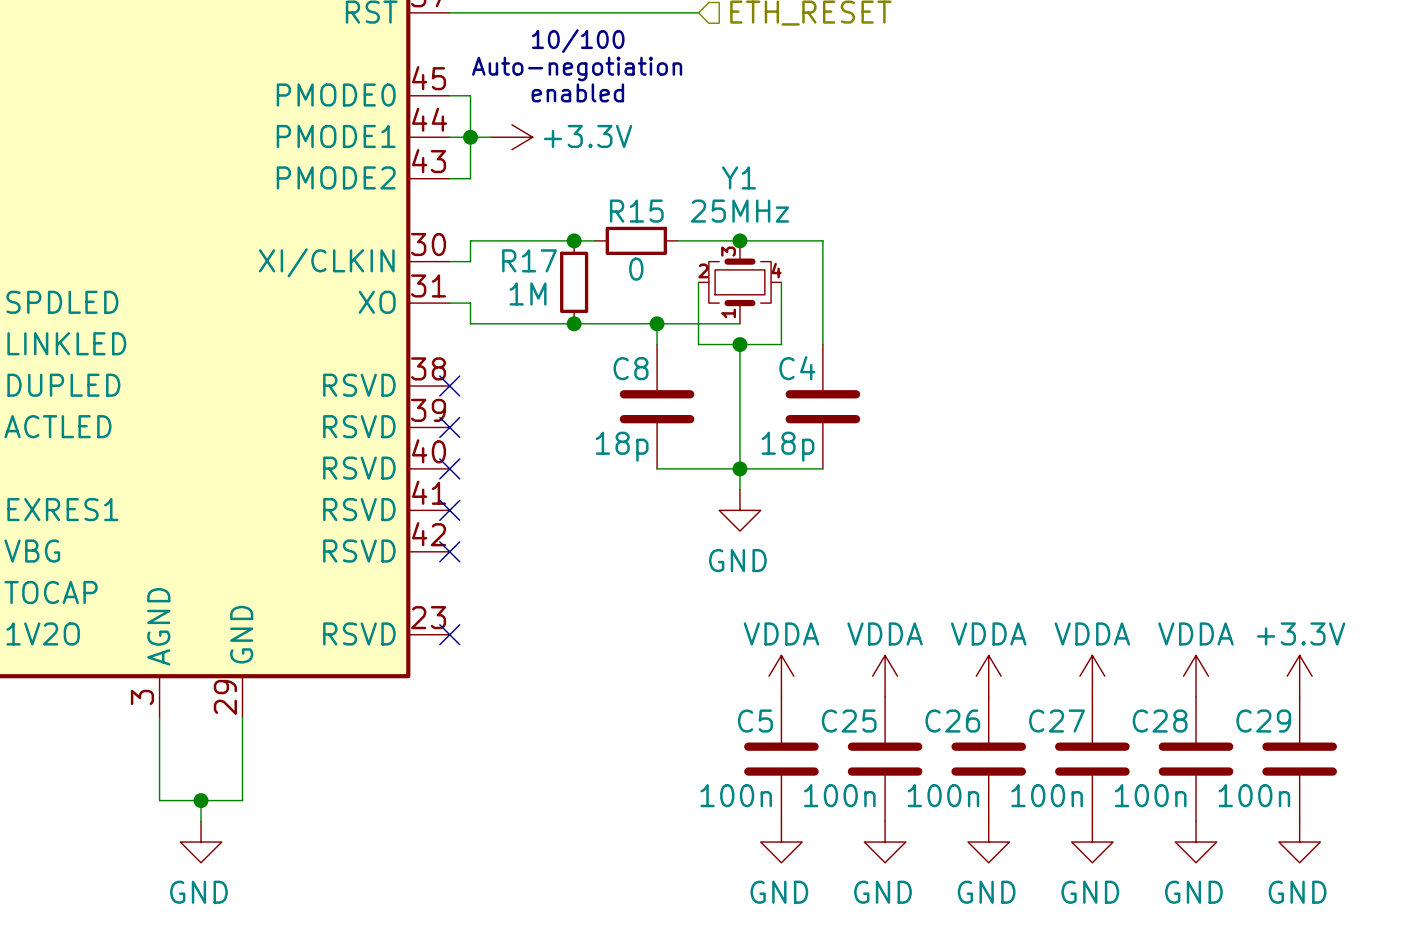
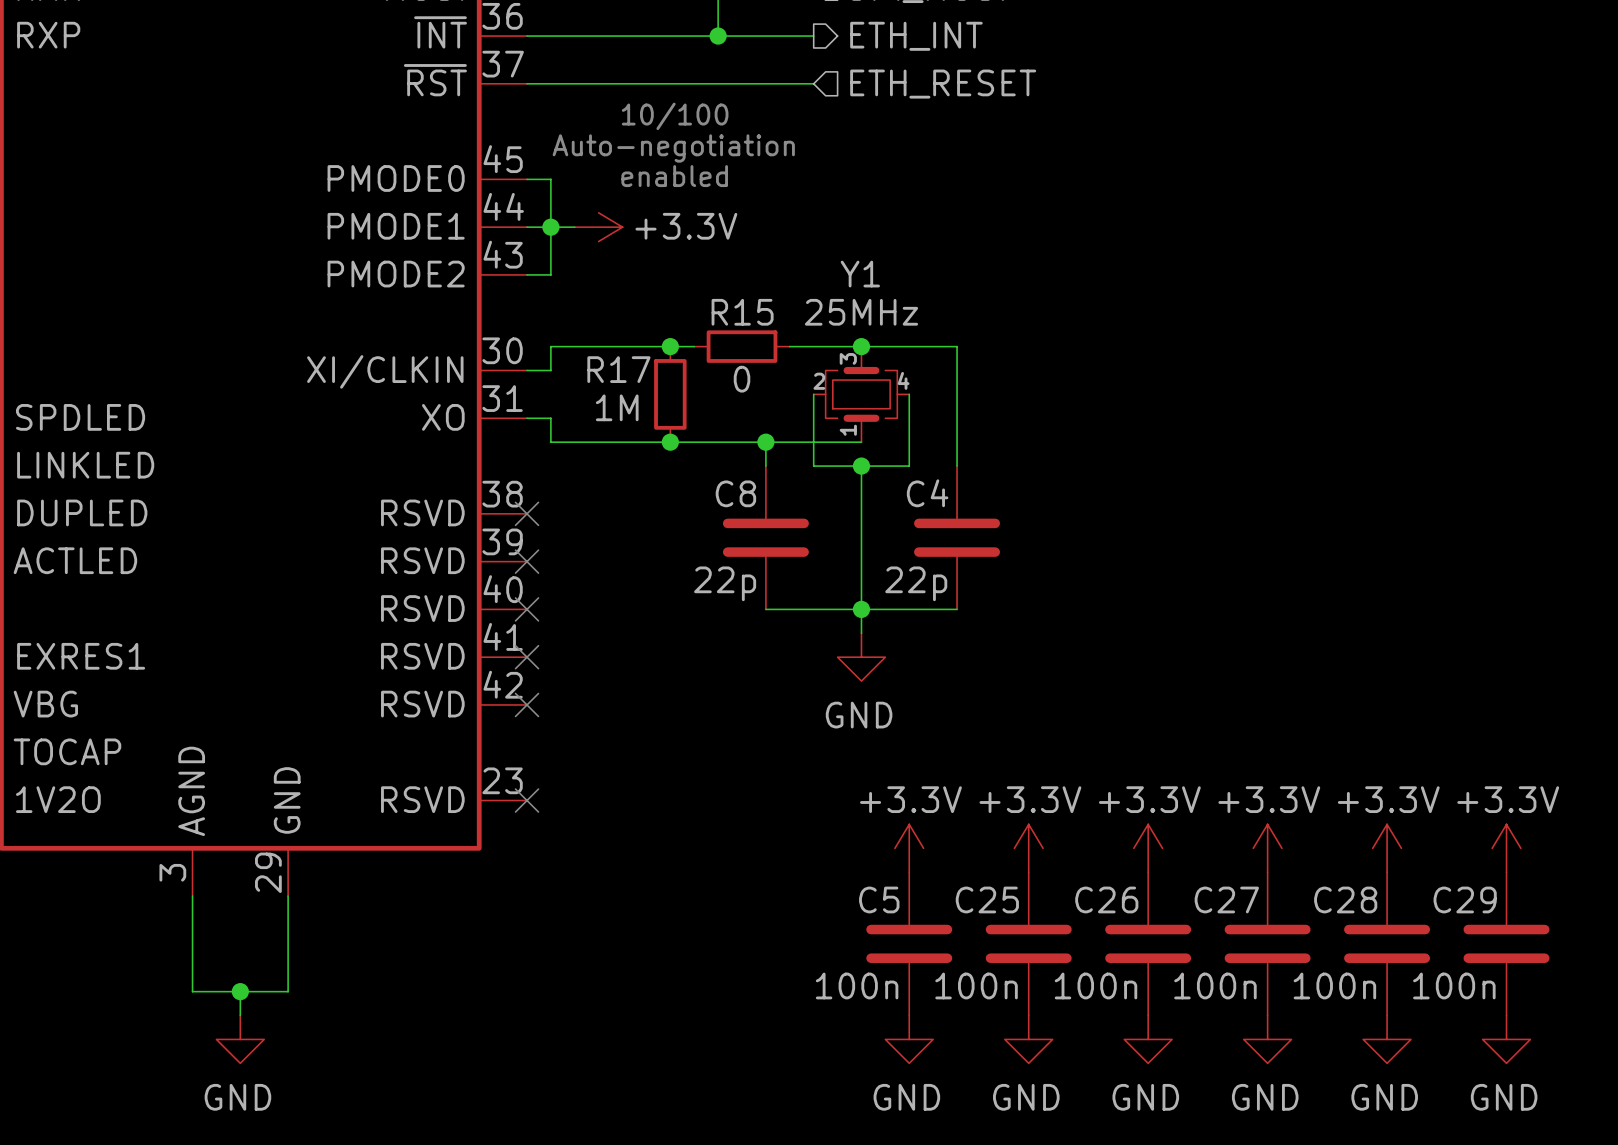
C8 value: 18p (622, 446) -> 22p (725, 583)
C4 value: 18p (787, 446) -> 22p (916, 583)
power symbol: VDDA (781, 676) -> +3.3V (909, 848)
power symbol: VDDA (885, 676) -> +3.3V (1028, 848)
power symbol: VDDA (988, 676) -> +3.3V (1148, 848)
power symbol: VDDA (1092, 676) -> +3.3V (1267, 848)
power symbol: VDDA (1196, 676) -> +3.3V (1387, 848)

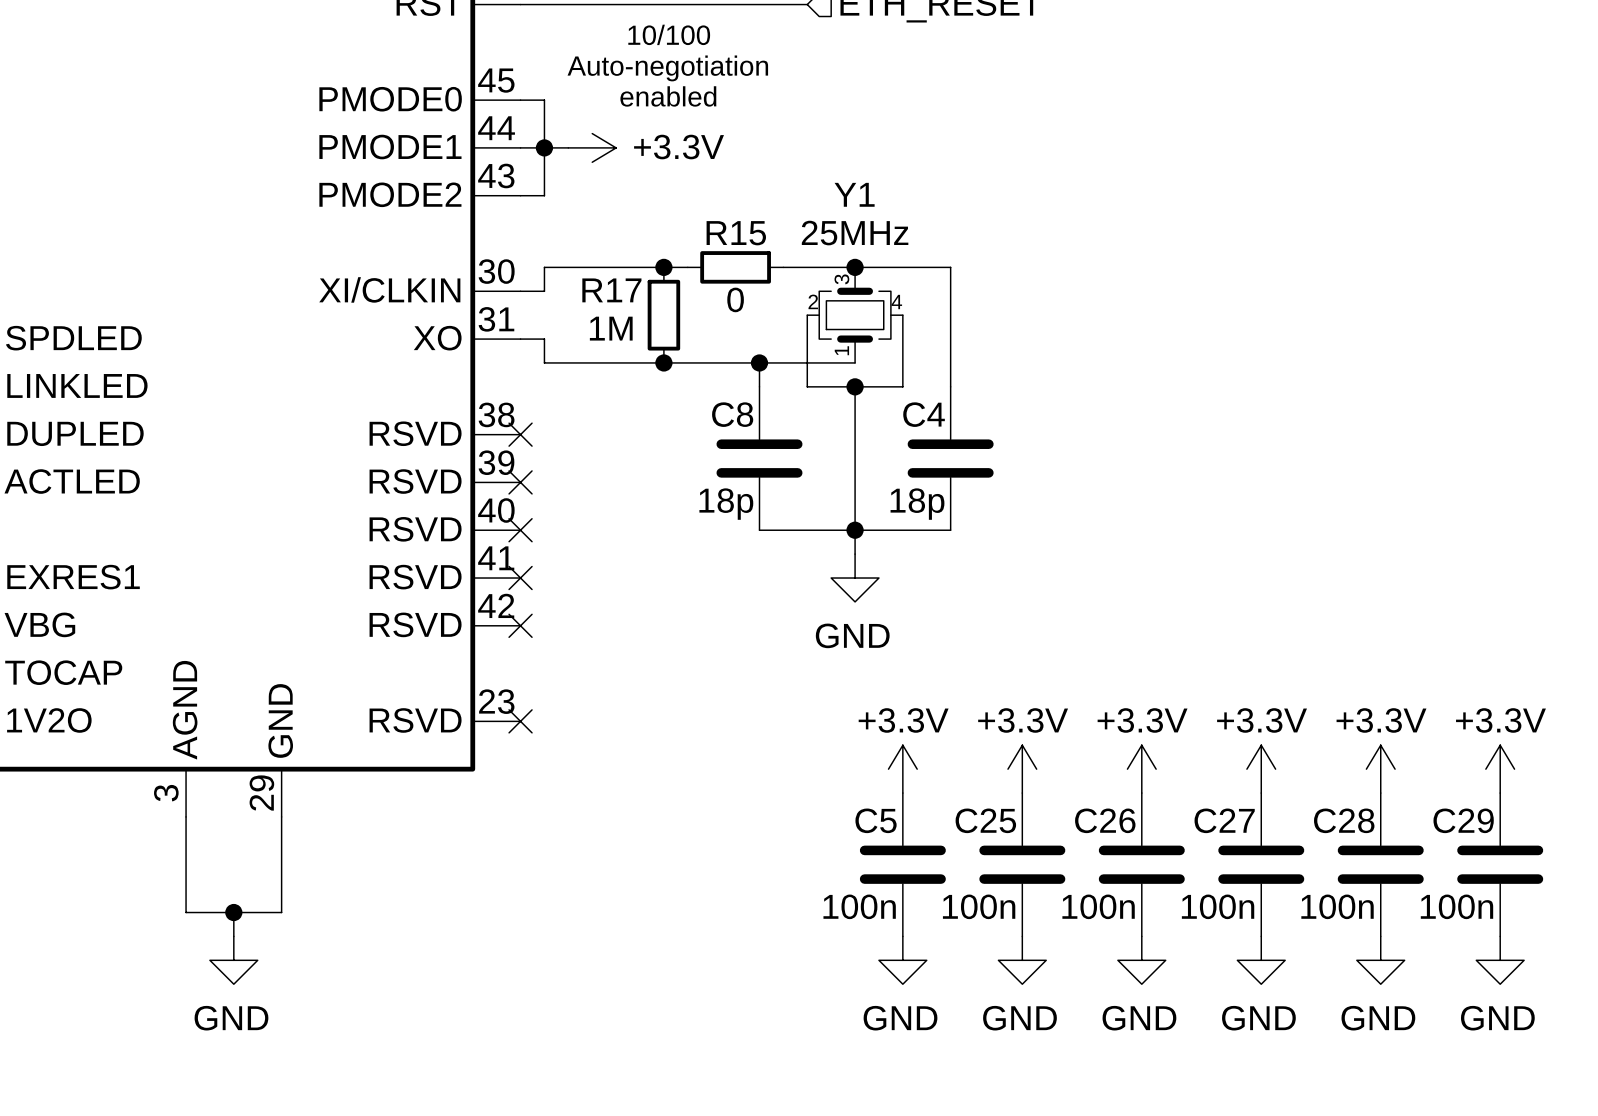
C8 value: 22p (725, 583) -> 18p (726, 504)
C4 value: 22p (916, 583) -> 18p (917, 504)

